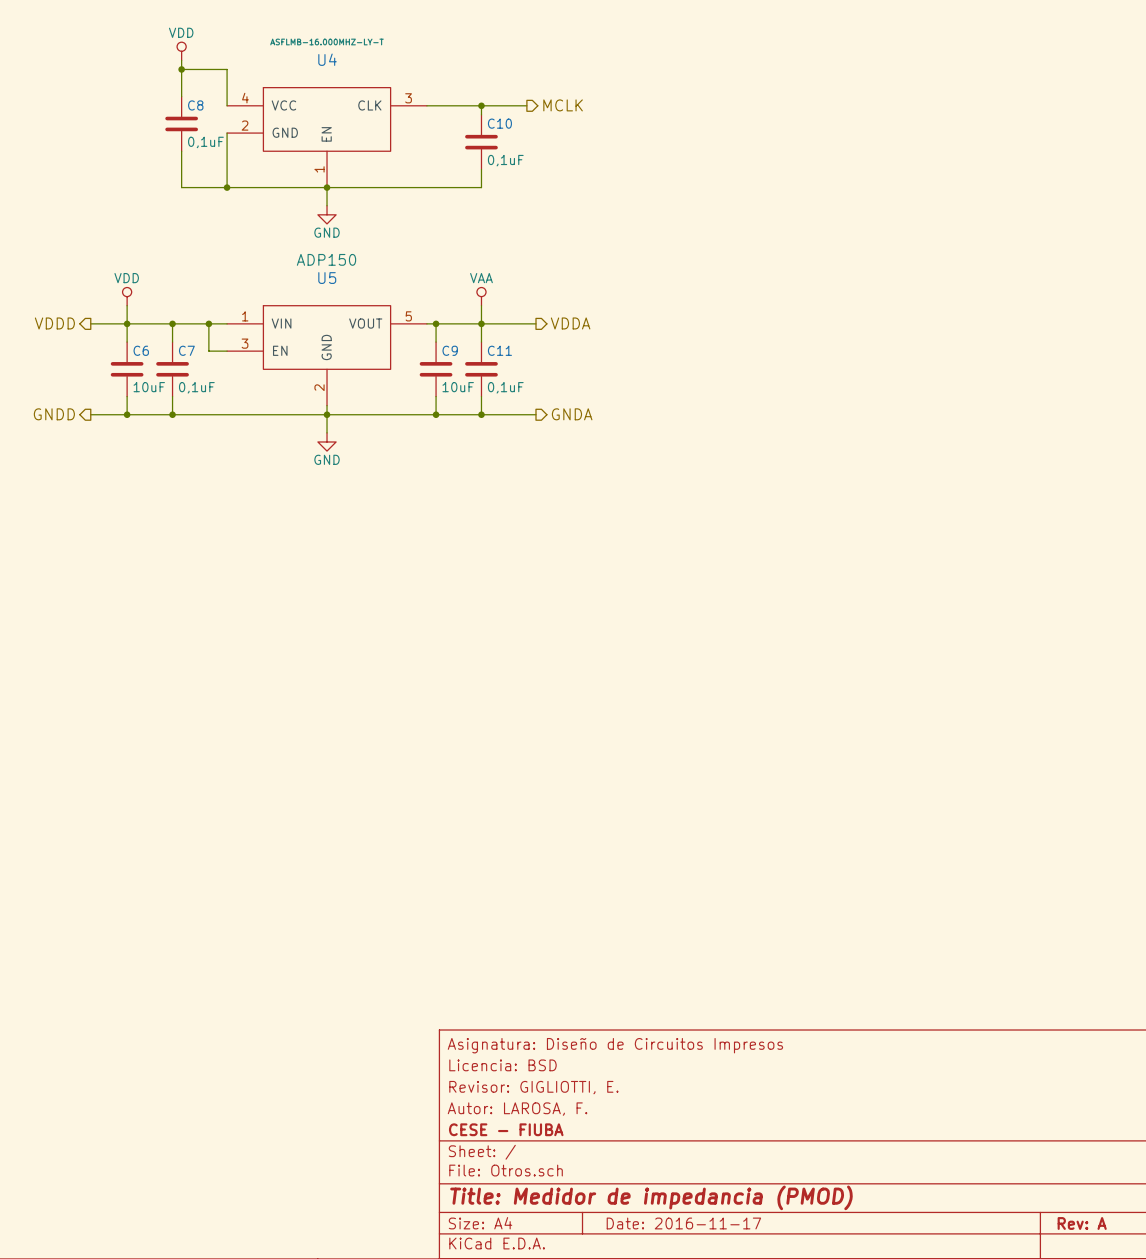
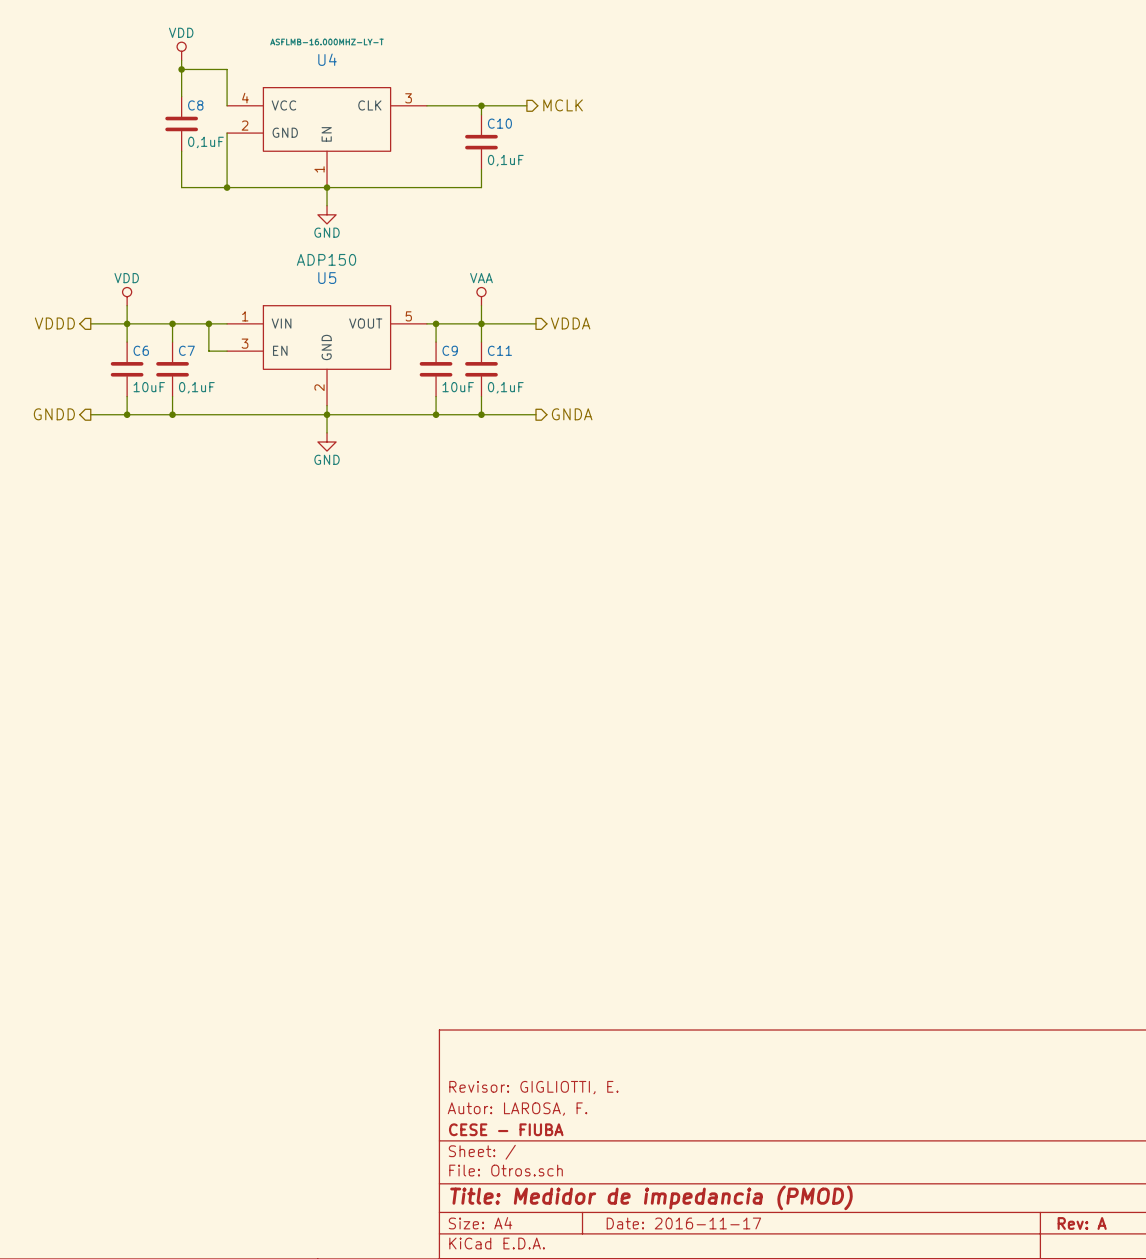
title block: Asignatura: Diseño de Circuitos Impresos (615, 1045) -> none
title block: Licencia: BSD (502, 1065) -> none

